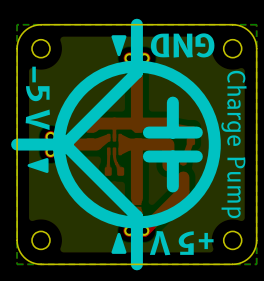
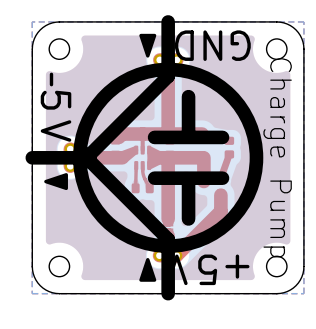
line: (172, 102) (172, 132) -> (188, 96) (188, 130)
line: none -> (222, 137) (154, 137)
line: (196, 132) (148, 132) -> none
line: (172, 156) (172, 186) -> (188, 184) (188, 218)
line: (196, 156) (148, 156) -> none
line: none -> (222, 178) (154, 178)

